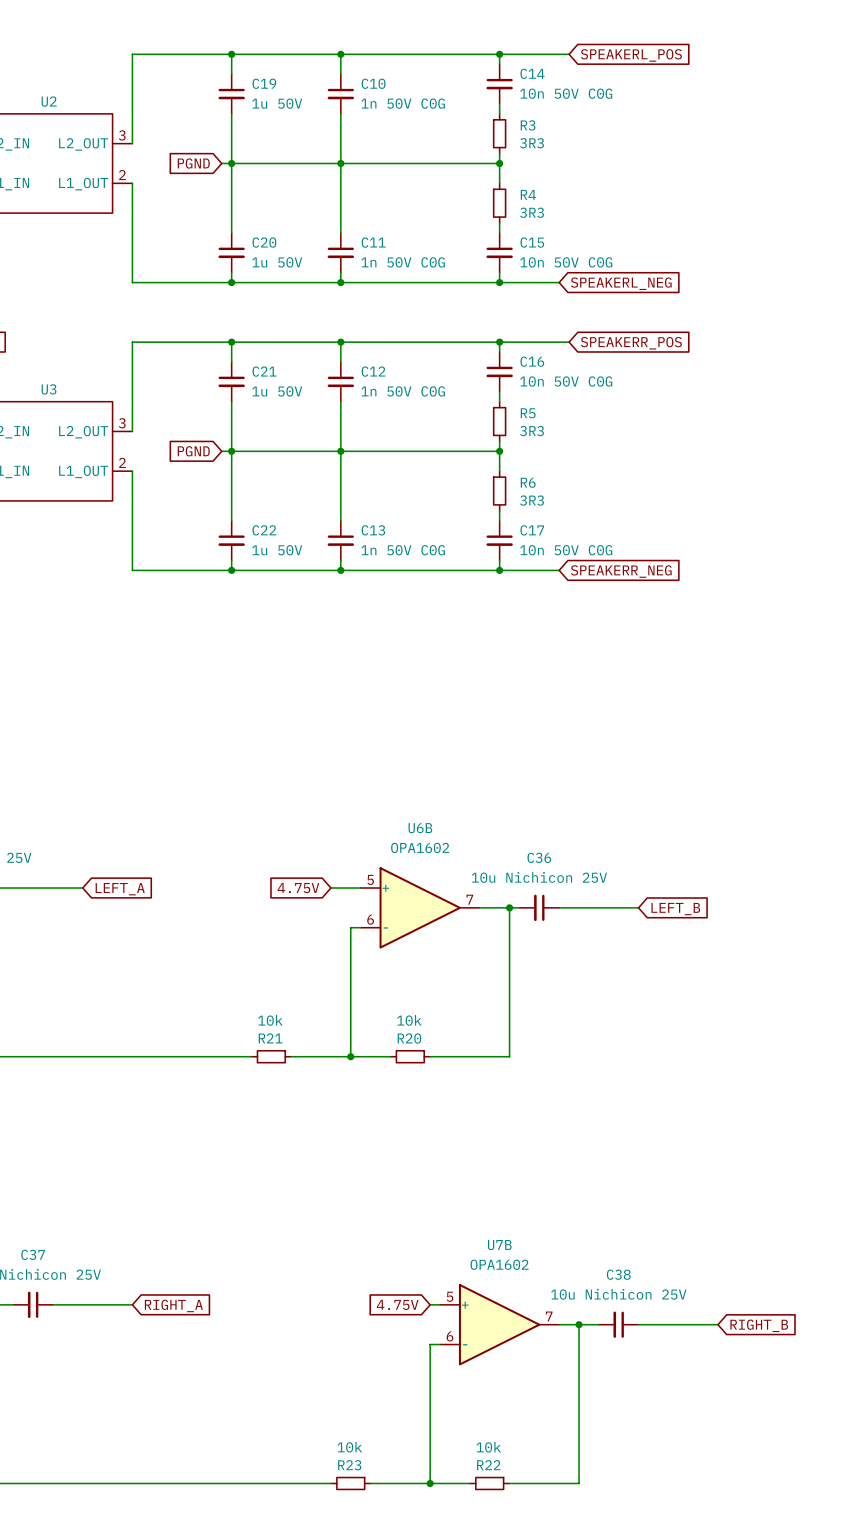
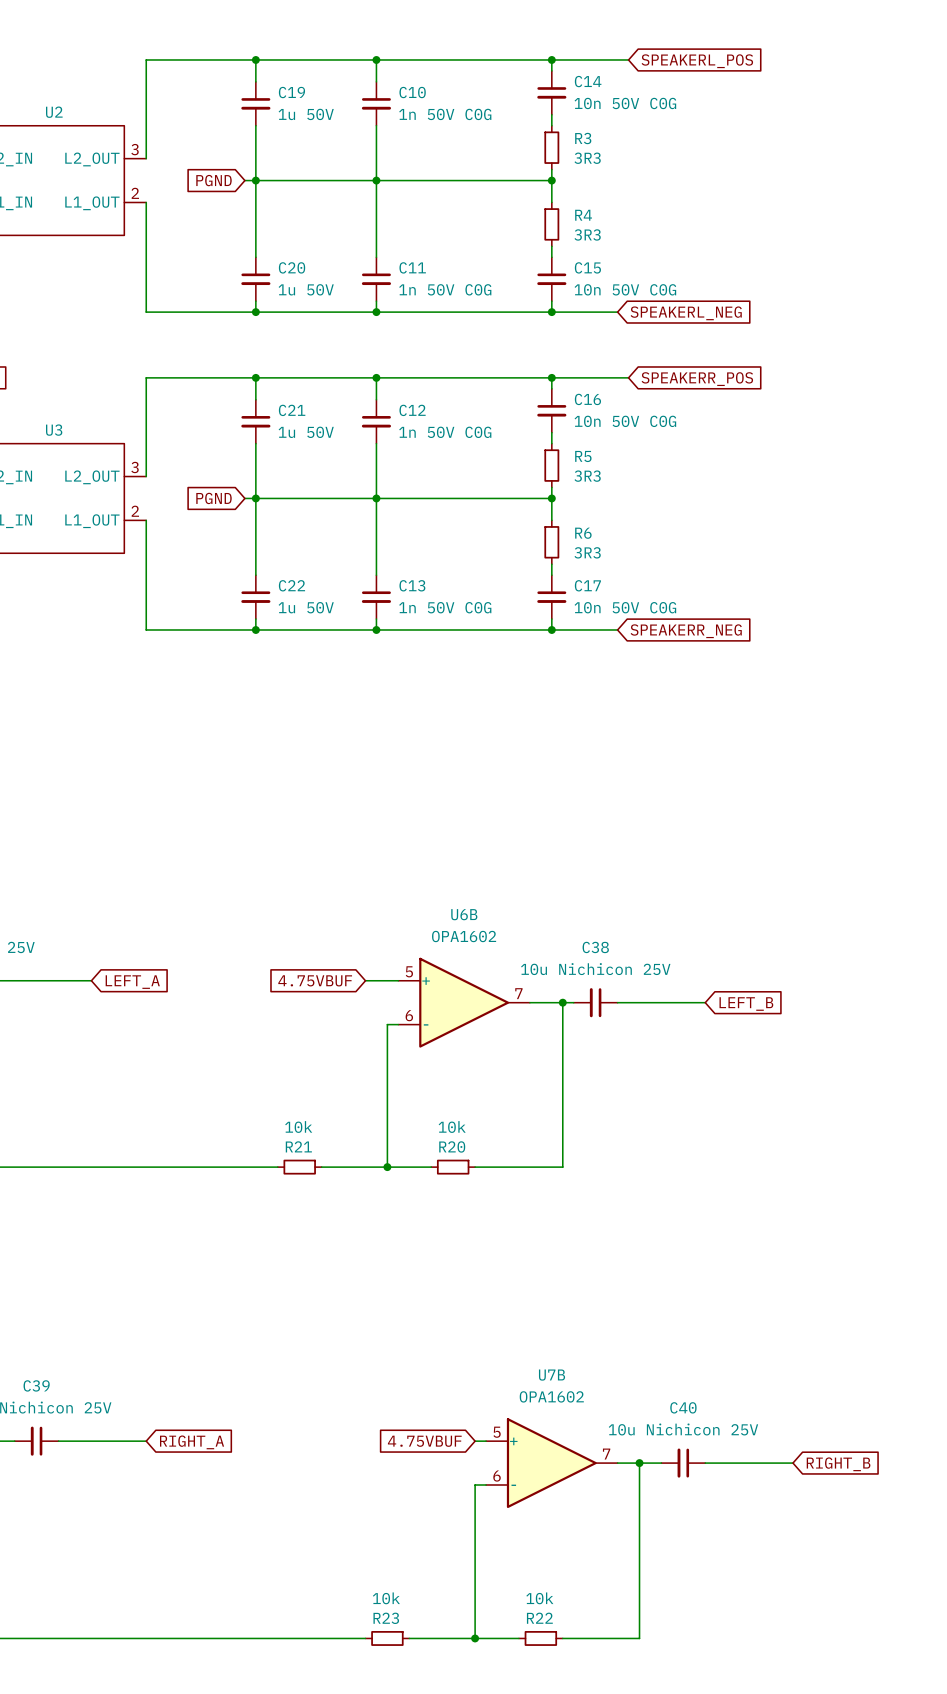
C36 name: C36 (539, 857) -> C38 (595, 947)
global label: 4.75V (298, 888) -> 4.75VBUF (315, 980)
C37 name: C37 (33, 1254) -> C39 (36, 1385)
C38 name: C38 (618, 1274) -> C40 (683, 1407)
global label: 4.75V (397, 1304) -> 4.75VBUF (424, 1441)

